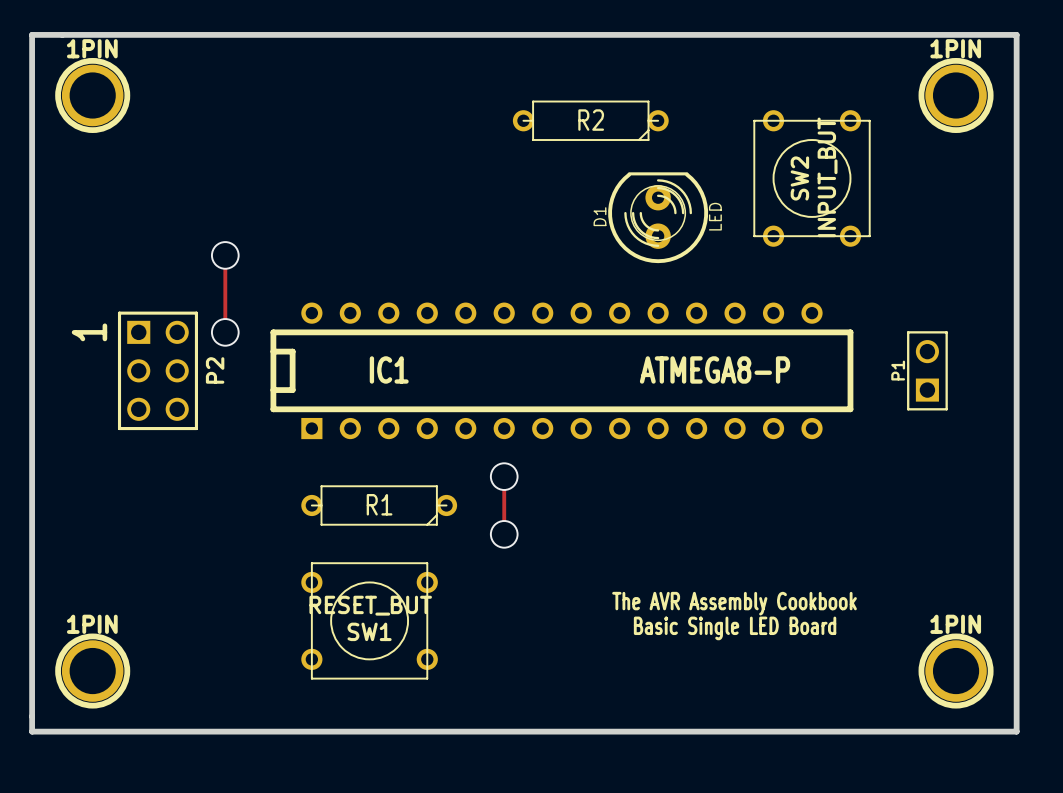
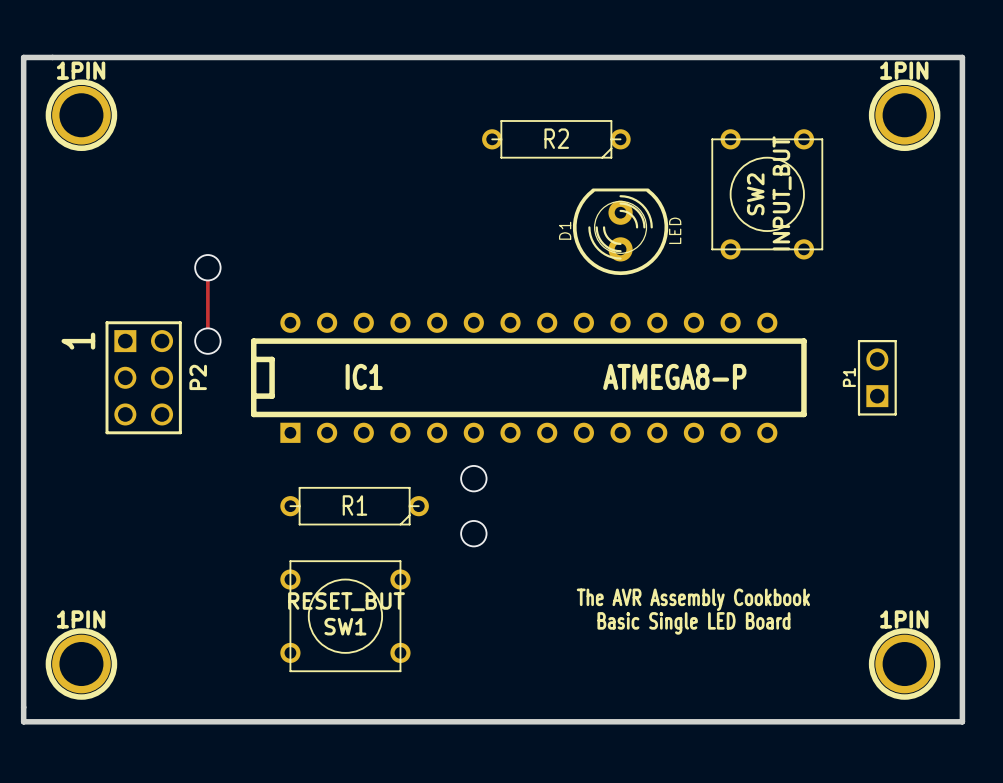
track: (504, 476) (504, 534) -> none

